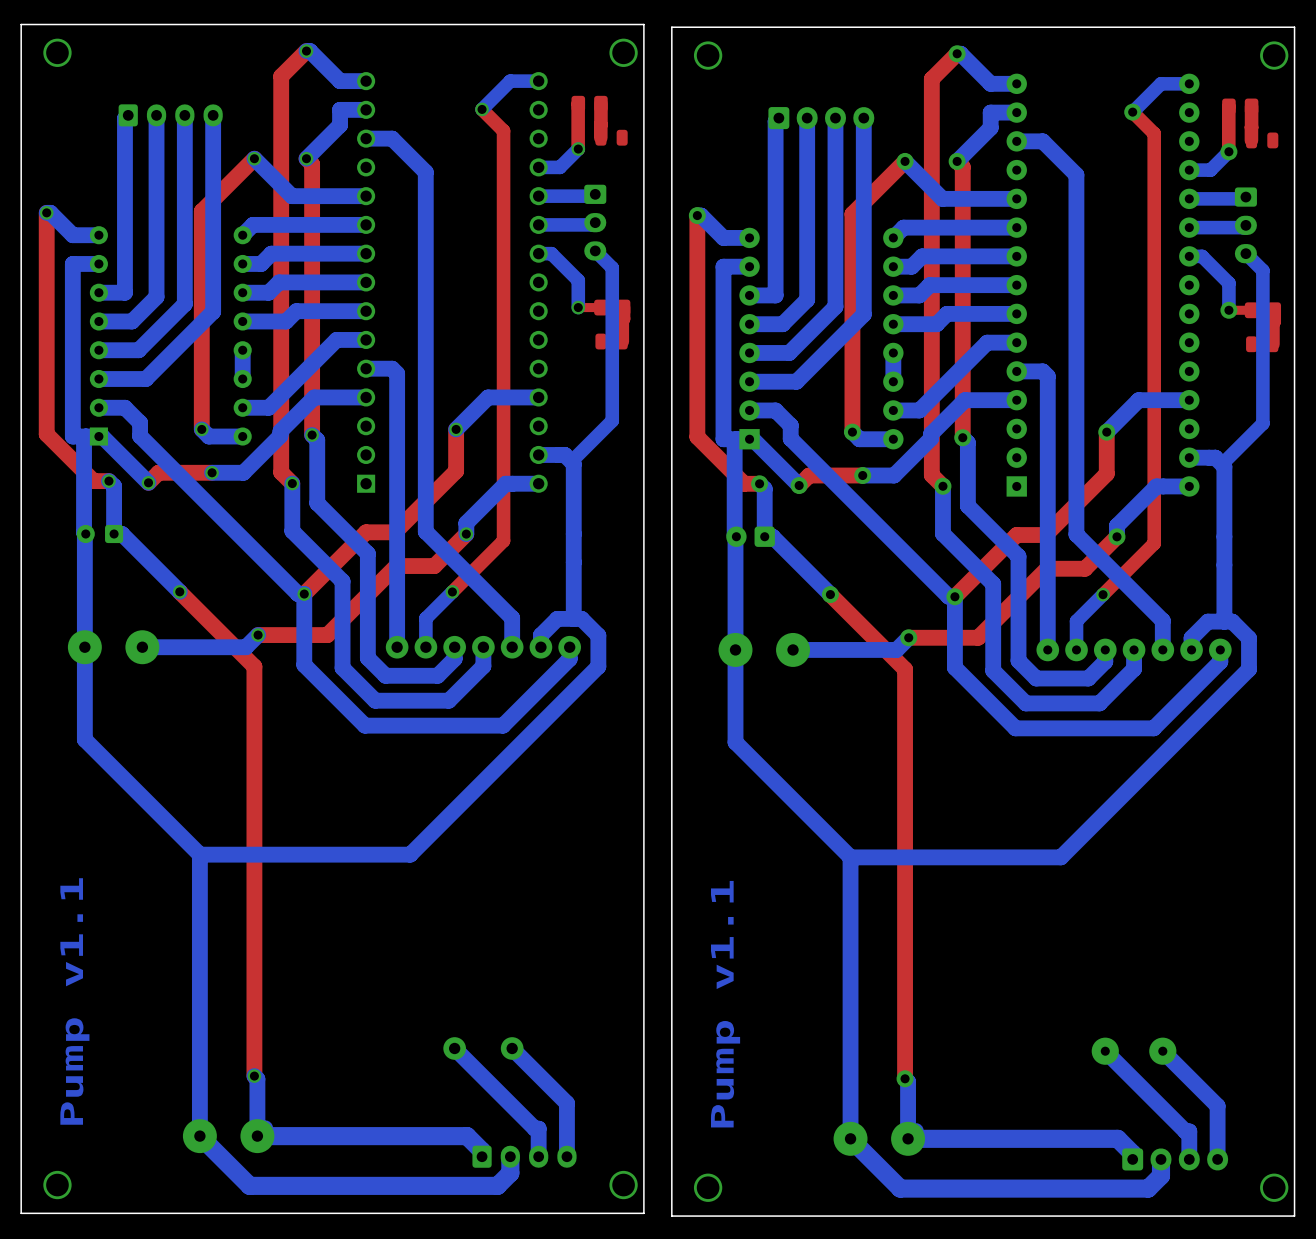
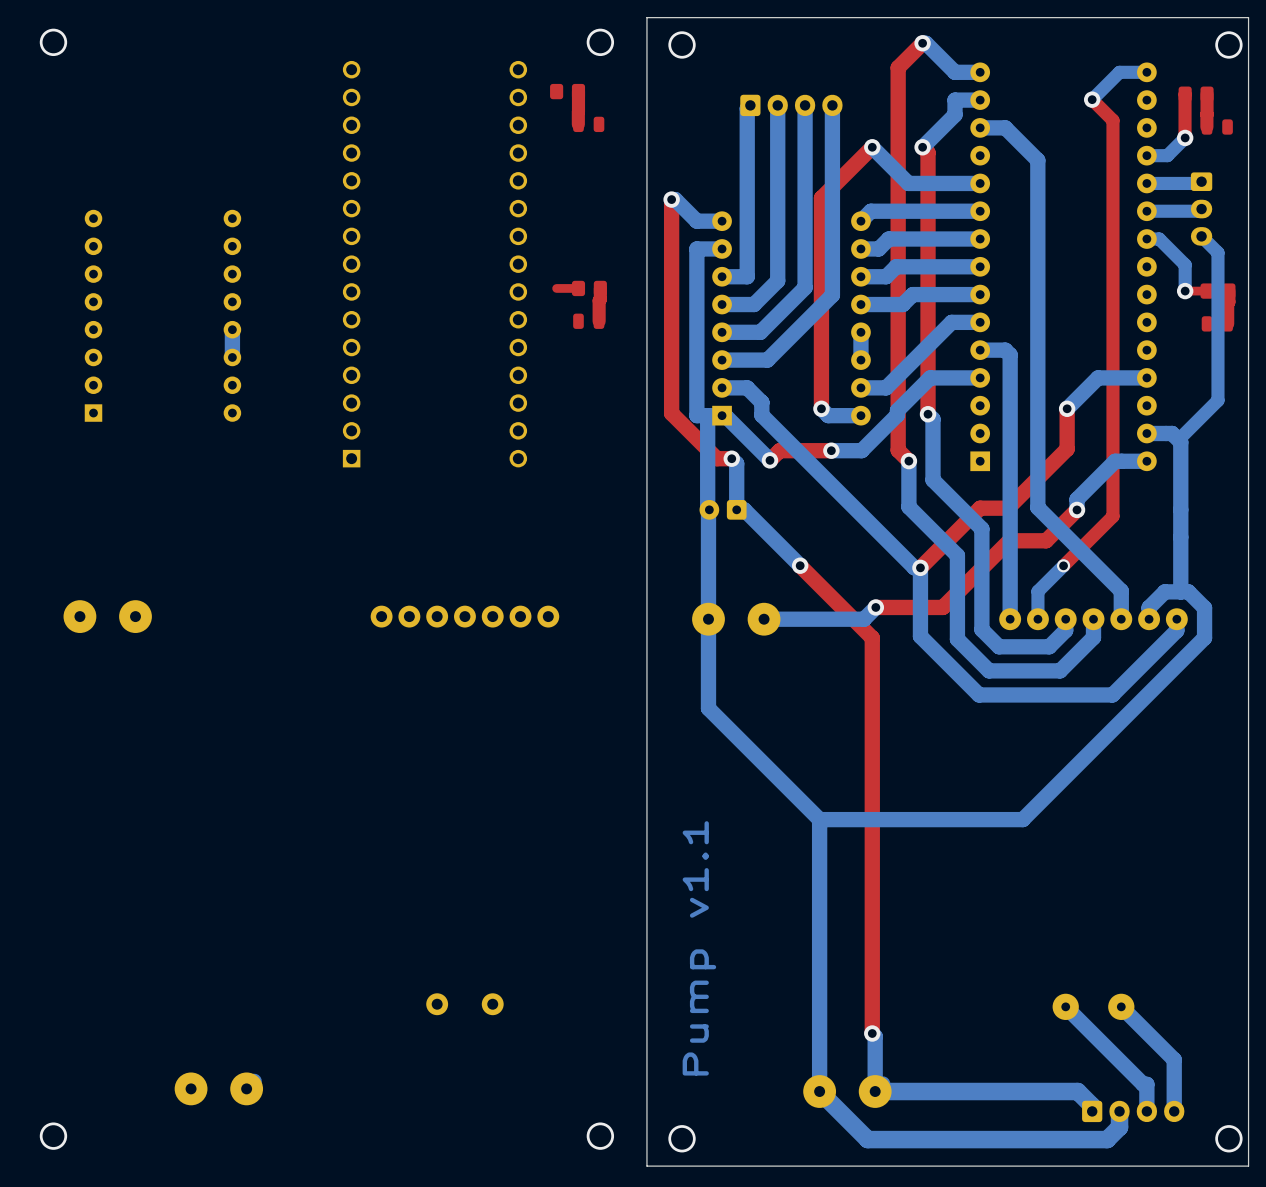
board edge: (643, 24) (21, 24) (21, 1213) (643, 1213) (643, 24) -> none
top track: (306, 51) (281, 76) (281, 472) (292, 483) -> none
bottom track: (306, 51) (309, 51) (340, 81) (366, 81) -> none
via: (306, 51) -> none
bottom track: (538, 81) (510, 81) (482, 109) -> none
top track: (578, 103) (578, 148) -> none
bottom track: (366, 109) (340, 109) (340, 125) (306, 158) -> none
top track: (482, 109) (503, 130) (503, 540) (452, 591) -> none
via: (482, 109) -> none
bottom track: (128, 115) (124, 118) (124, 292) (98, 292) -> none
bottom track: (156, 115) (156, 296) (132, 321) (98, 321) -> none
part: (170, 115) -> none
bottom track: (184, 115) (184, 304) (138, 350) (98, 350) -> none
bottom track: (213, 115) (213, 311) (145, 379) (98, 379) -> none
bottom track: (366, 138) (392, 138) (425, 172) (425, 531) (512, 618) (512, 647) -> none
bottom track: (578, 149) (559, 167) (538, 167) -> none
via: (578, 149) -> none
top track: (254, 158) (201, 211) (201, 429) -> none
bottom track: (254, 158) (291, 196) (366, 196) -> none
via: (254, 158) -> none
top track: (306, 158) (312, 164) (312, 435) -> none
via: (306, 158) -> none
bottom track: (595, 194) (593, 196) (538, 196) -> none
top track: (46, 212) (46, 434) (93, 481) (108, 481) -> none
bottom track: (46, 212) (50, 212) (72, 235) (98, 235) -> none
via: (46, 212) -> none
bottom track: (595, 222) (593, 224) (538, 224) -> none
part: (595, 222) -> none
bottom track: (366, 224) (253, 224) (242, 235) -> none
bottom track: (595, 250) (612, 267) (612, 420) (573, 459) (573, 464) -> none
bottom track: (366, 253) (271, 253) (261, 263) (242, 263) -> none
bottom track: (538, 253) (551, 253) (578, 280) (578, 307) -> none
bottom track: (98, 263) (72, 263) (72, 436) (102, 436) (148, 482) -> none
bottom track: (366, 282) (279, 282) (268, 292) (242, 292) -> none
via: (578, 307) -> none
bottom track: (366, 311) (296, 311) (286, 321) (242, 321) -> none
bottom track: (366, 339) (336, 339) (268, 407) (242, 407) -> none
bottom track: (366, 368) (392, 368) (397, 373) (397, 647) -> none
bottom track: (366, 397) (314, 397) (280, 431) (280, 435) (243, 472) (212, 472) -> none
bottom track: (538, 397) (488, 397) (456, 429) -> none
bottom track: (98, 407) (124, 407) (140, 422) (140, 436) (298, 594) (304, 594) (304, 664) (364, 725) (503, 725) (569, 659) (569, 647) -> none
bottom track: (201, 429) (208, 436) (242, 436) -> none
via: (201, 429) -> none
top track: (456, 429) (456, 471) (394, 532) (366, 532) (304, 594) -> none
via: (456, 429) -> none
bottom track: (312, 435) (317, 440) (317, 503) (367, 553) (367, 658) (385, 675) (437, 675) (454, 658) (454, 647) -> none
via: (312, 435) -> none
bottom track: (85, 436) (84, 438) (84, 739) (199, 854) -> none
bottom track: (538, 454) (564, 454) (573, 464) -> none
bottom track: (573, 464) (573, 618) -> none
top track: (212, 472) (158, 472) (148, 482) -> none
via: (212, 472) -> none
bottom track: (108, 481) (114, 486) (114, 534) (121, 534) (179, 591) -> none
via: (108, 481) -> none
via: (148, 482) -> none
bottom track: (292, 483) (292, 531) (342, 581) (342, 667) (375, 700) (448, 700) (483, 666) (483, 647) -> none
via: (292, 483) -> none
bottom track: (538, 483) (505, 483) (466, 523) (466, 534) -> none
part: (99, 534) -> none
top track: (466, 534) (434, 566) (396, 566) (327, 635) (258, 635) -> none
via: (466, 534) -> none
via: (179, 591) -> none
bottom track: (452, 591) (425, 618) (425, 647) -> none
via: (452, 591) -> none
top track: (179, 592) (254, 666) (254, 1076) -> none
via: (304, 594) -> none
bottom track: (258, 635) (245, 647) (142, 647) -> none
via: (258, 635) -> none
bottom track: (540, 647) (540, 635) (557, 618) (581, 618) (598, 635) (598, 666) (410, 854) (199, 854) -> none
bottom track: (199, 854) (199, 1136) (249, 1185) (497, 1185) (510, 1173) (510, 1156) -> none
text: Pump v1.1 (74, 1001) -> none
bottom track: (454, 1048) (534, 1128) (538, 1128) (538, 1156) -> none
bottom track: (512, 1048) (566, 1103) (566, 1156) -> none
bottom track: (254, 1076) (257, 1079) (257, 1136) (467, 1136) (482, 1151) (482, 1156) -> none
via: (254, 1076) -> none
part: (524, 1156) -> none

